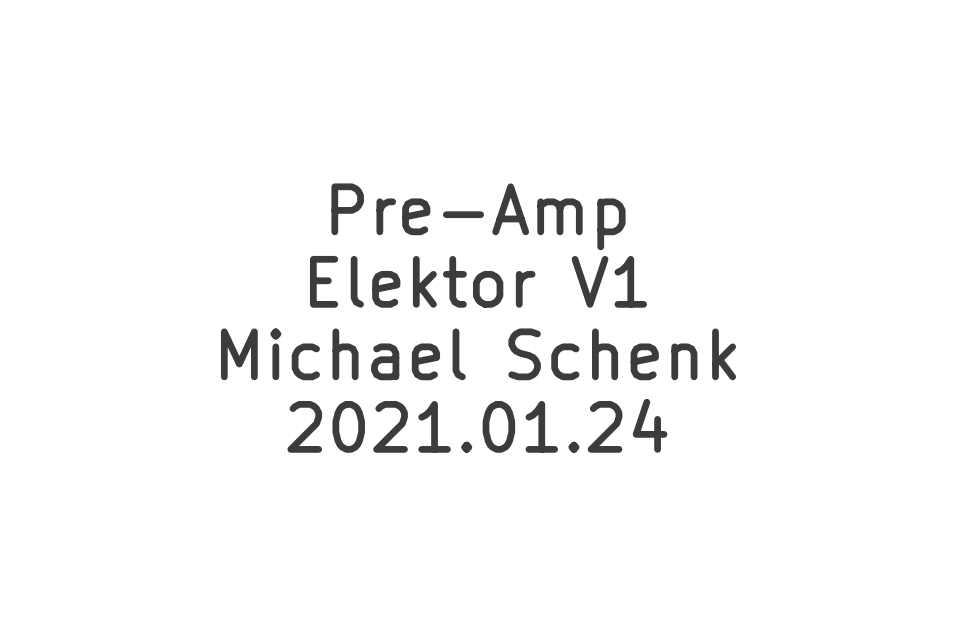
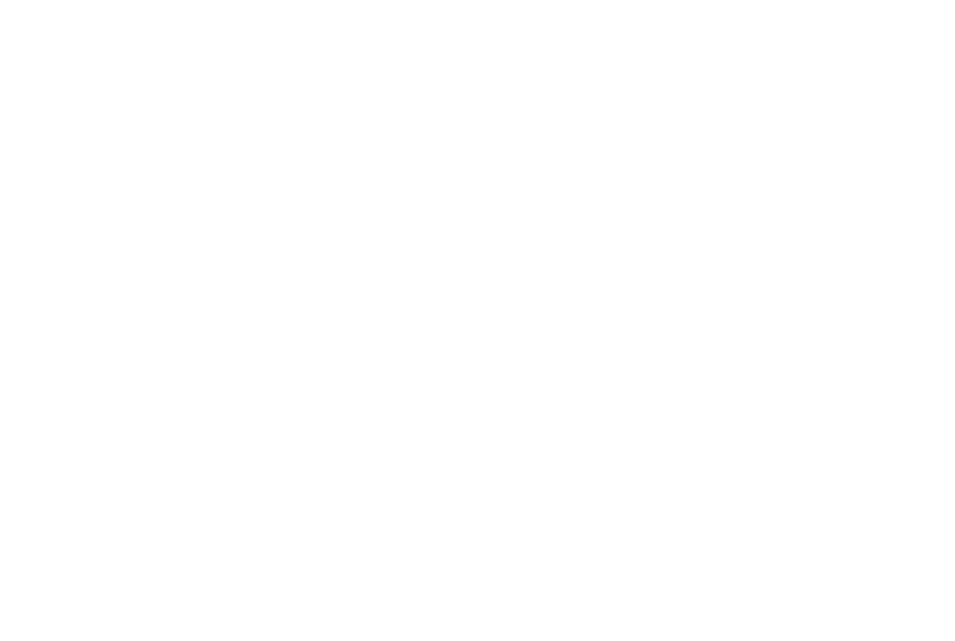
text: Pre-Amp (478, 216) -> none
text: Elektor V1 (478, 281) -> none
text: Michael Schenk (478, 354) -> none
text: 2021.01.24 (477, 425) -> none

